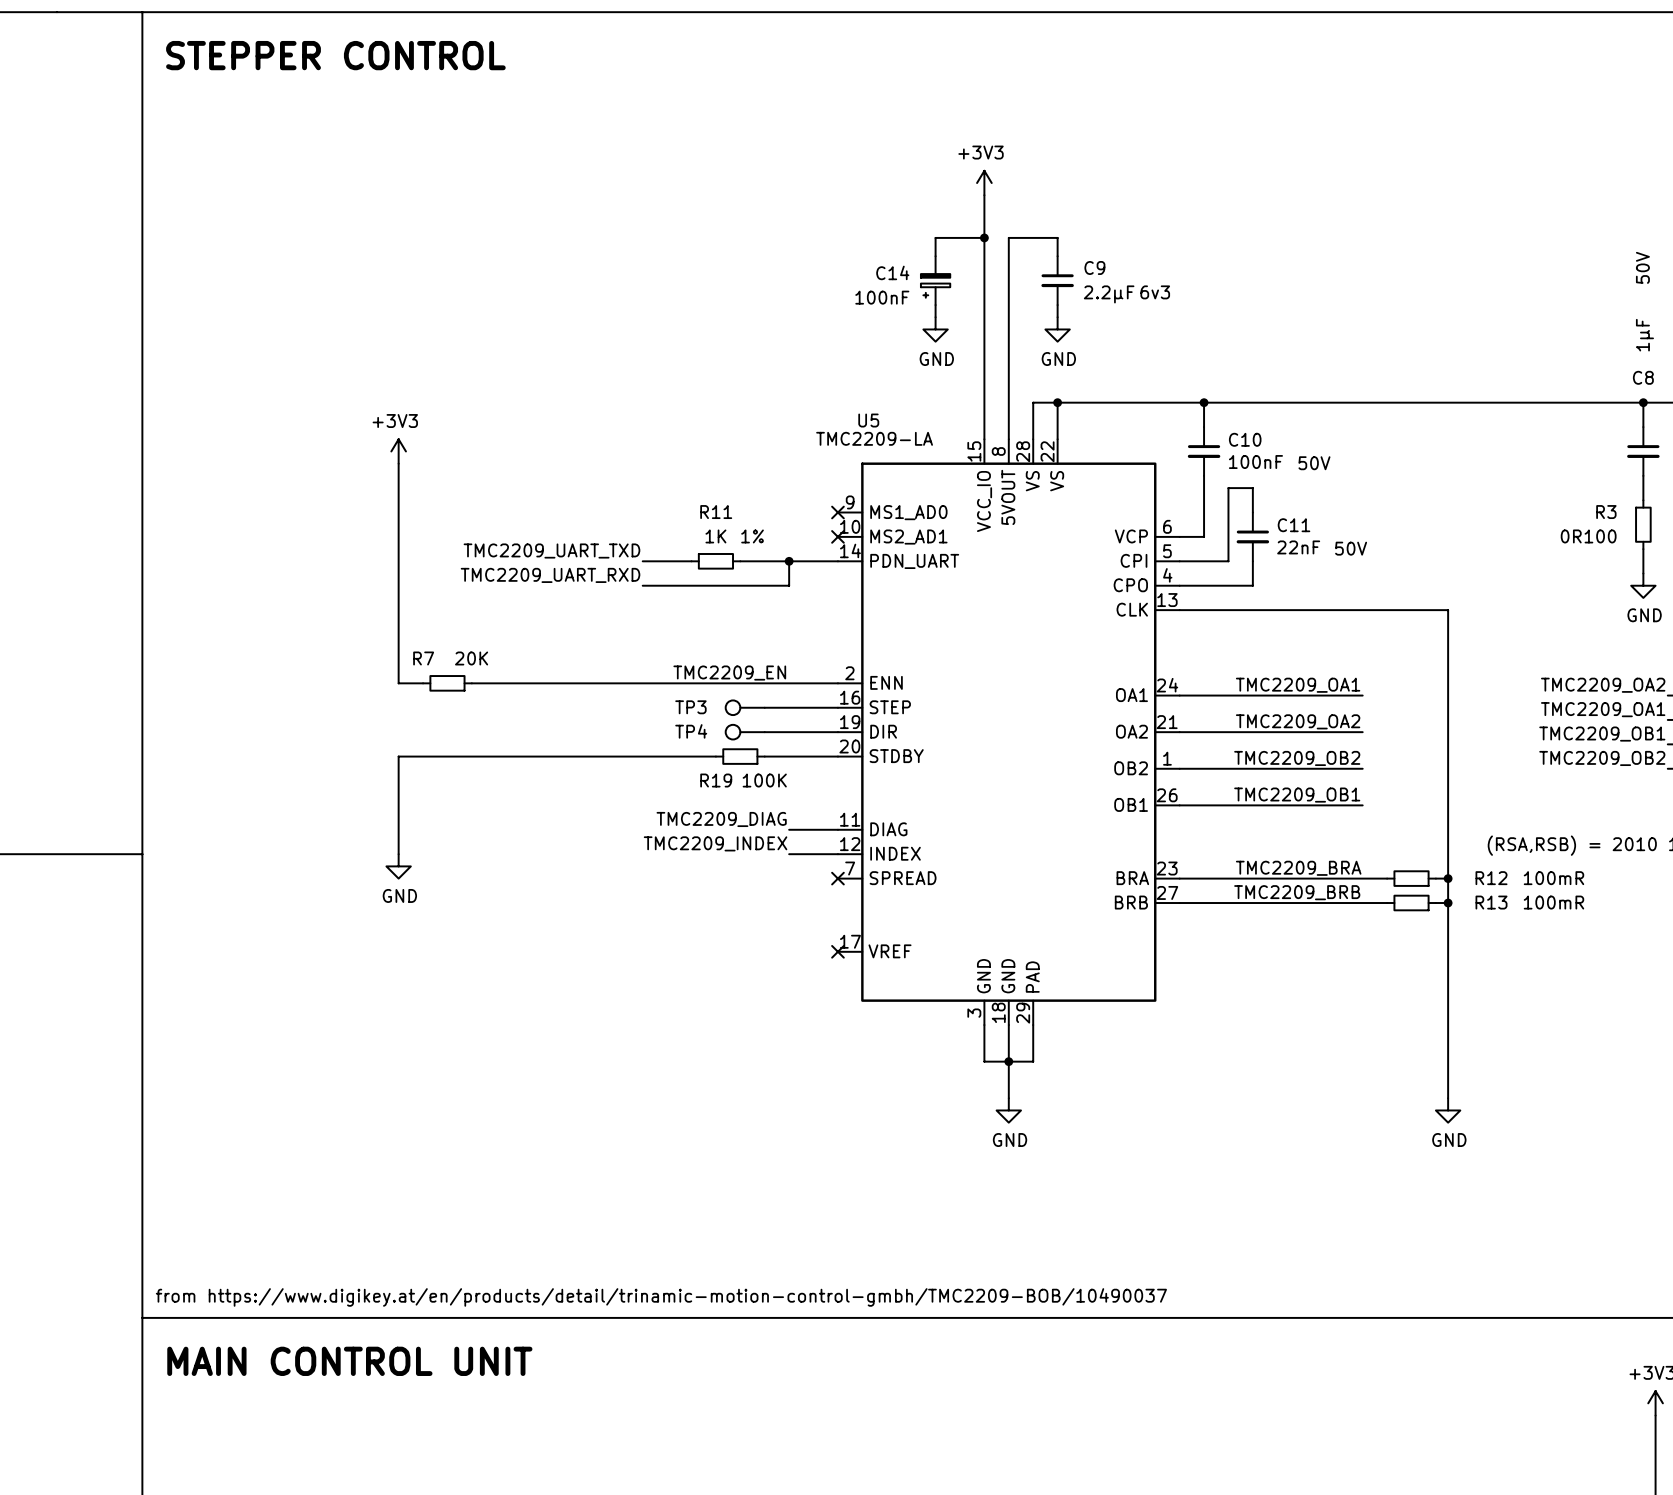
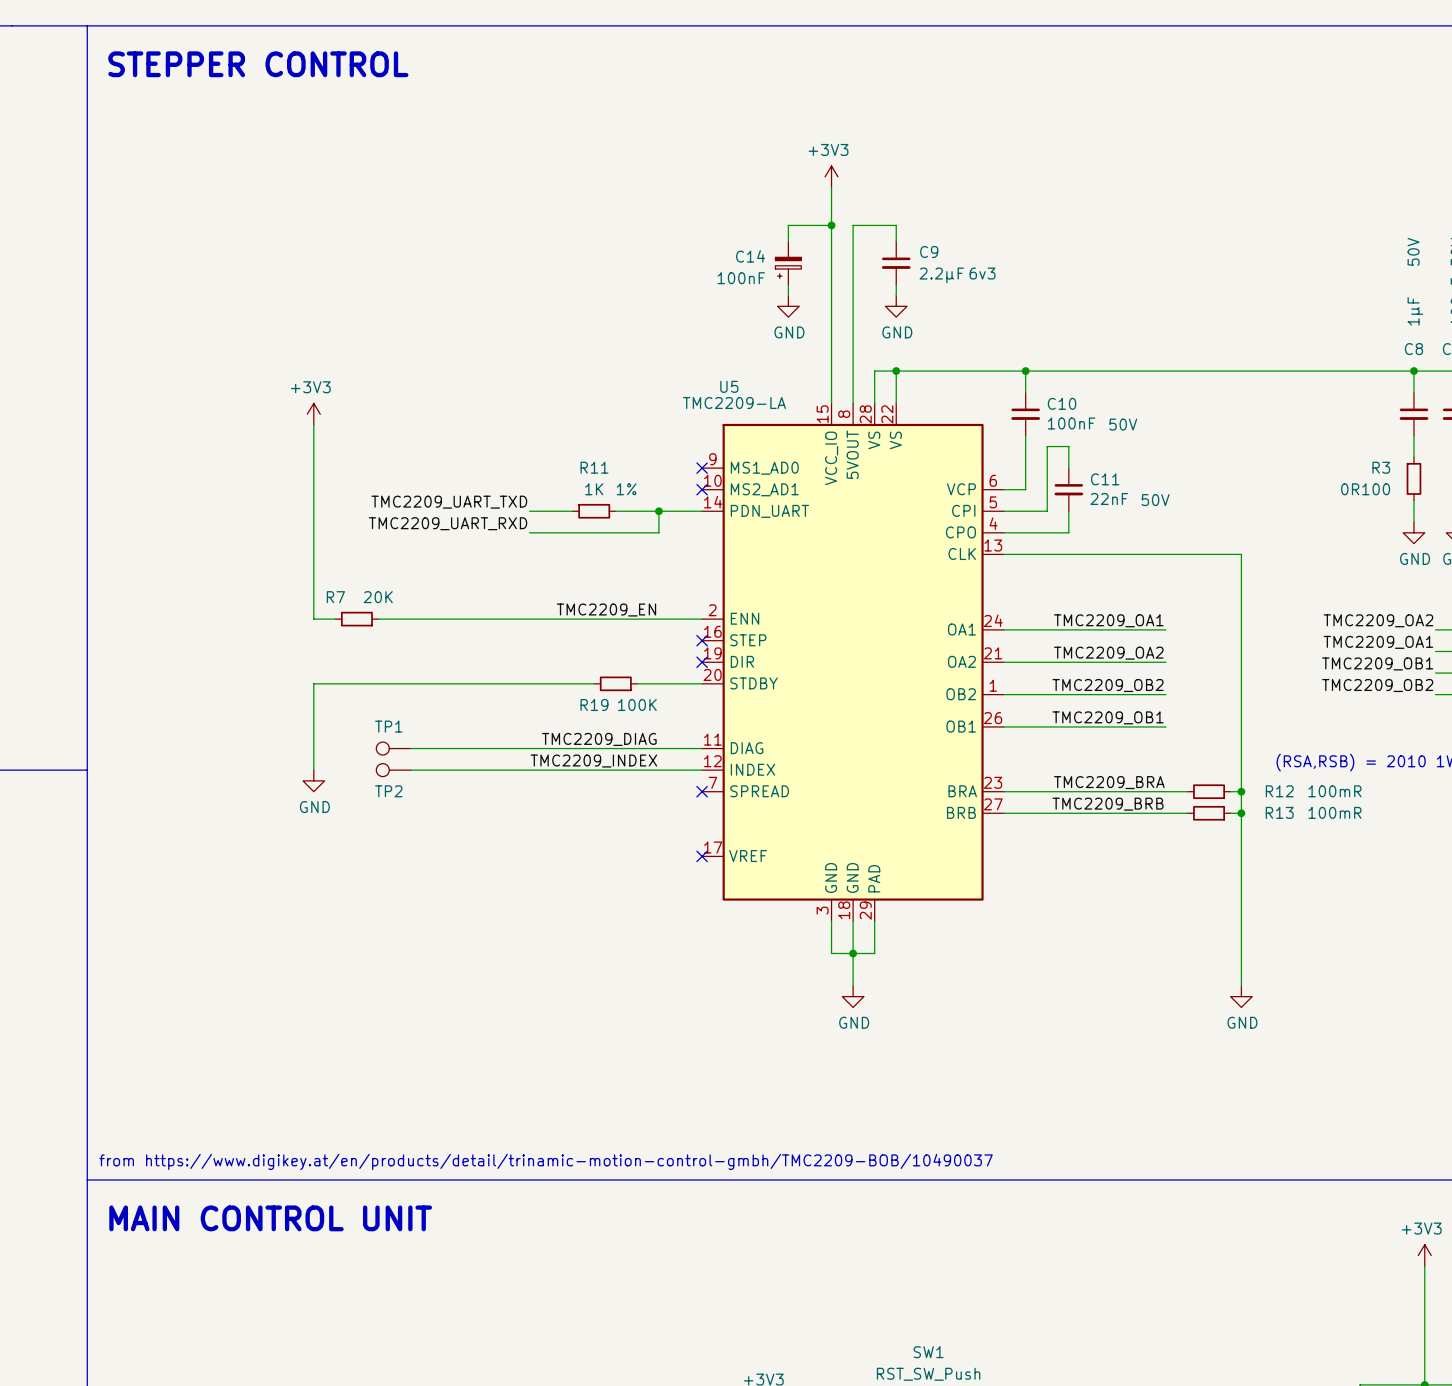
TP3: (745, 707) -> none
wire: (764, 707) (837, 707) -> none
no-connect mark: none -> (702, 640)
TP4: (745, 732) -> none
wire: (764, 732) (837, 732) -> none
no-connect mark: none -> (702, 662)
TP1: none -> (393, 748)
wire: none -> (410, 748) (658, 748)
TP2: none -> (393, 770)
wire: none -> (410, 770) (658, 770)

